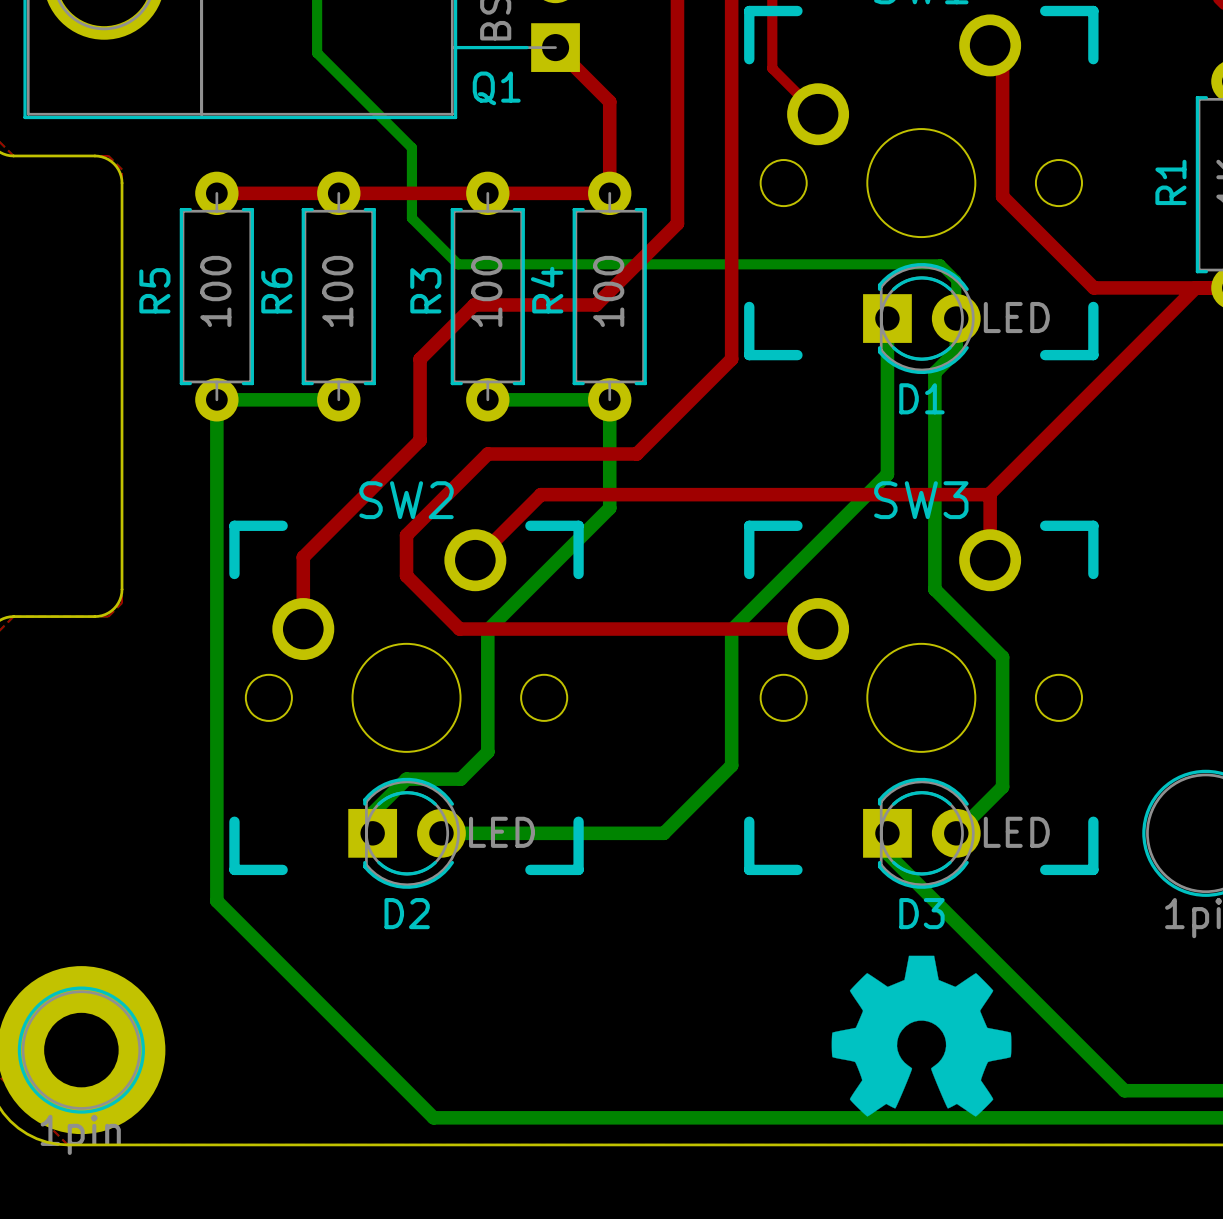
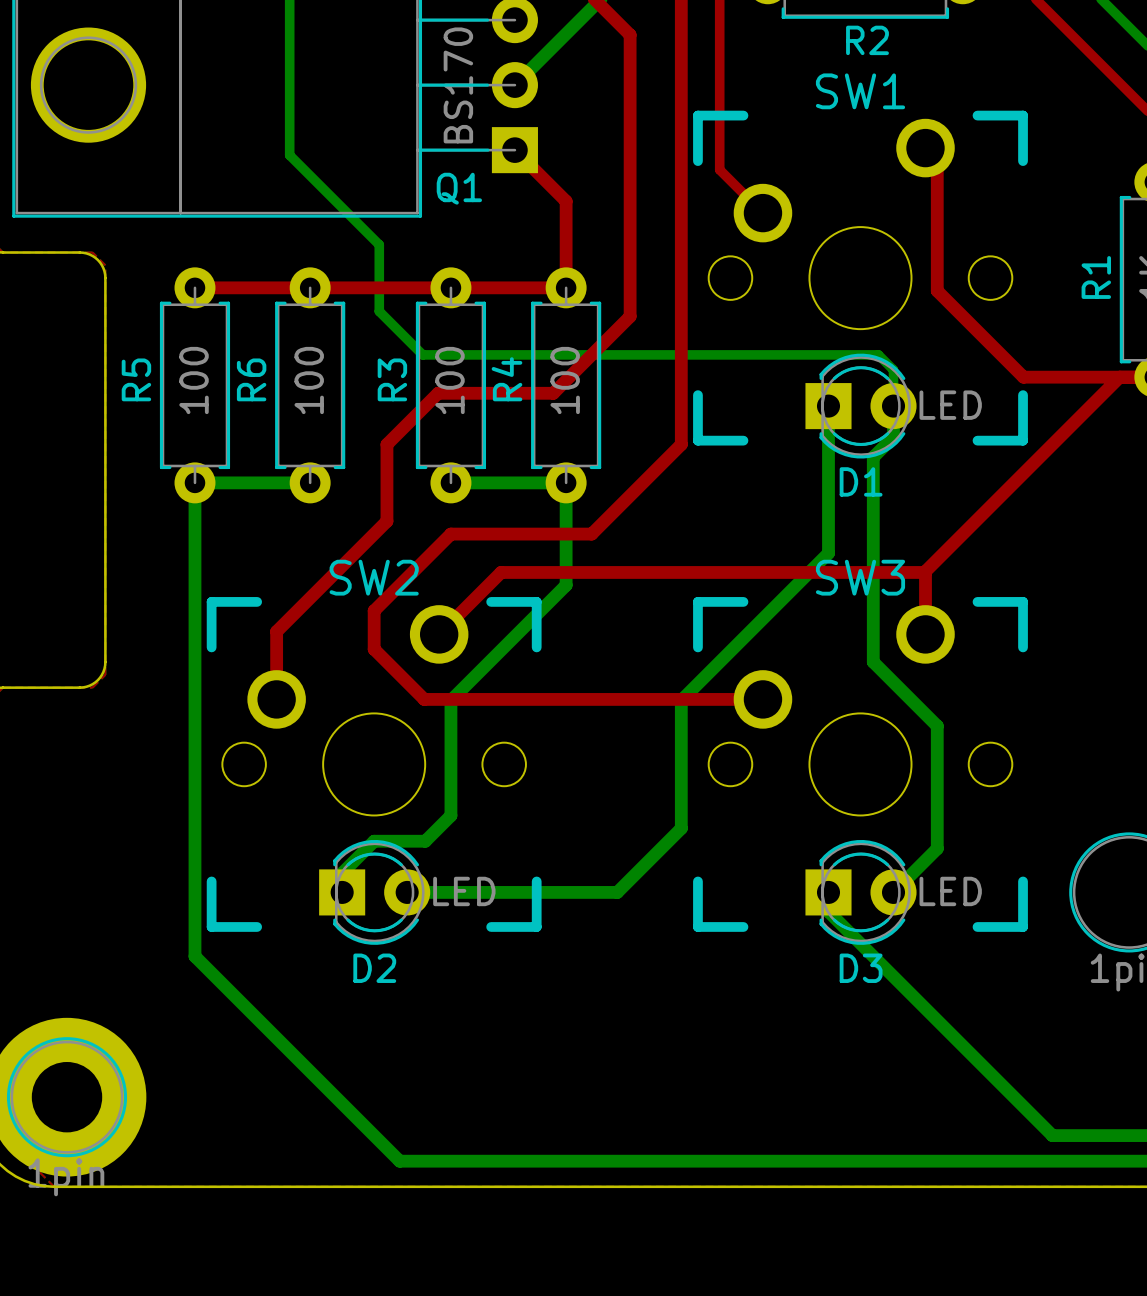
drawing: [831, 955, 1012, 1117] -> none

